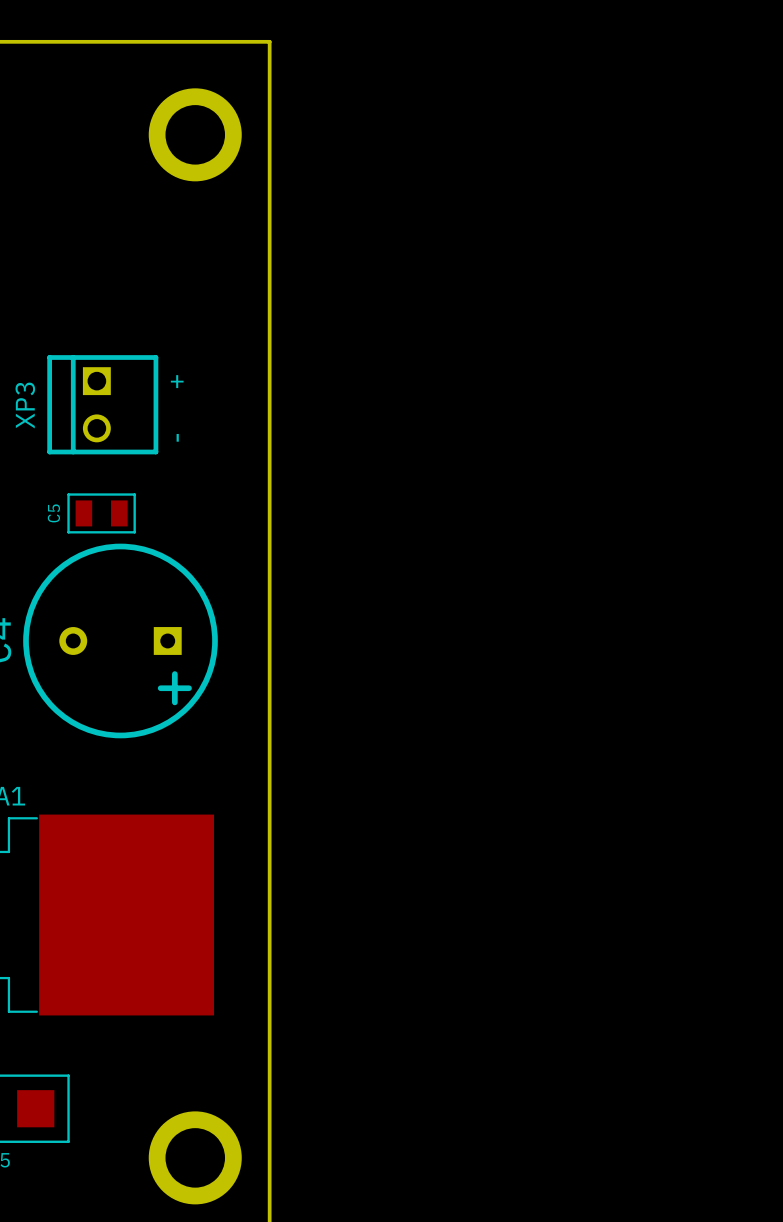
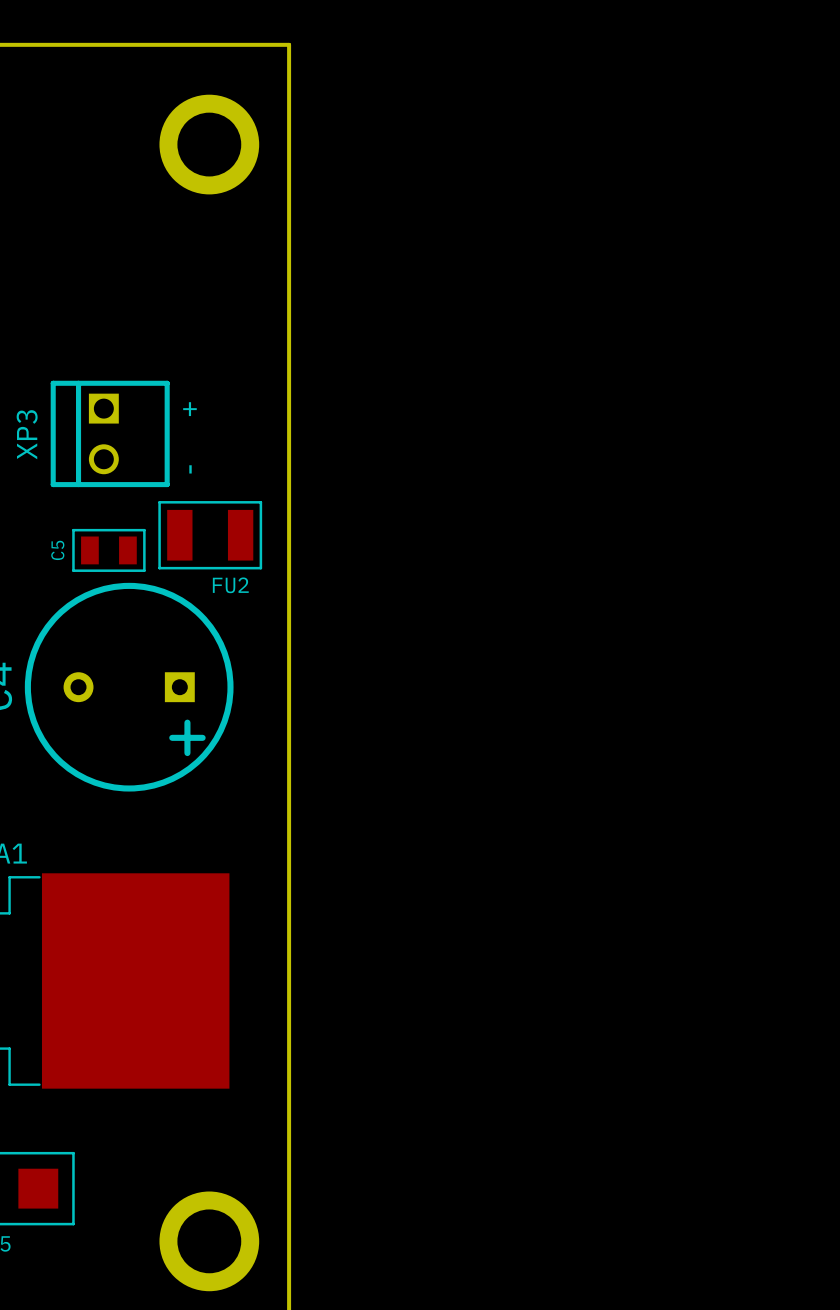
FU2: none -> (210, 535)

